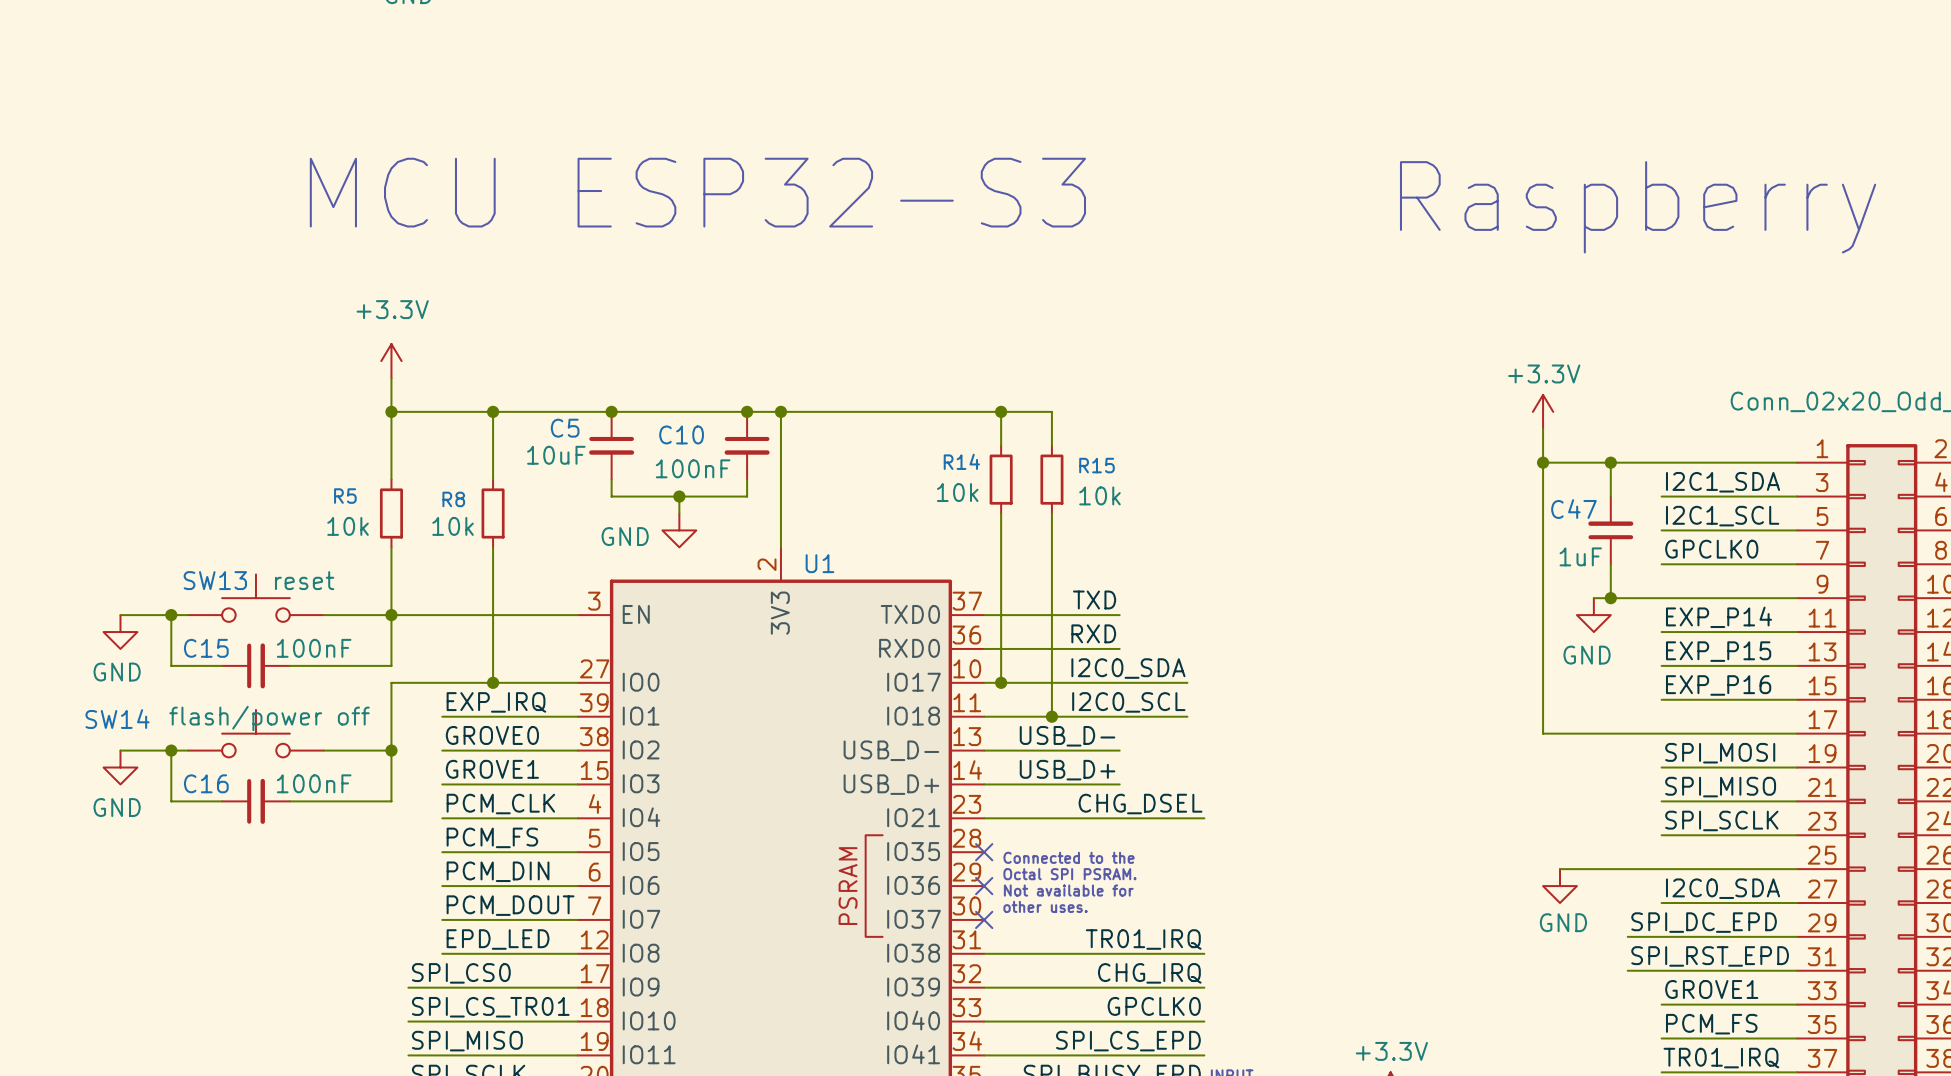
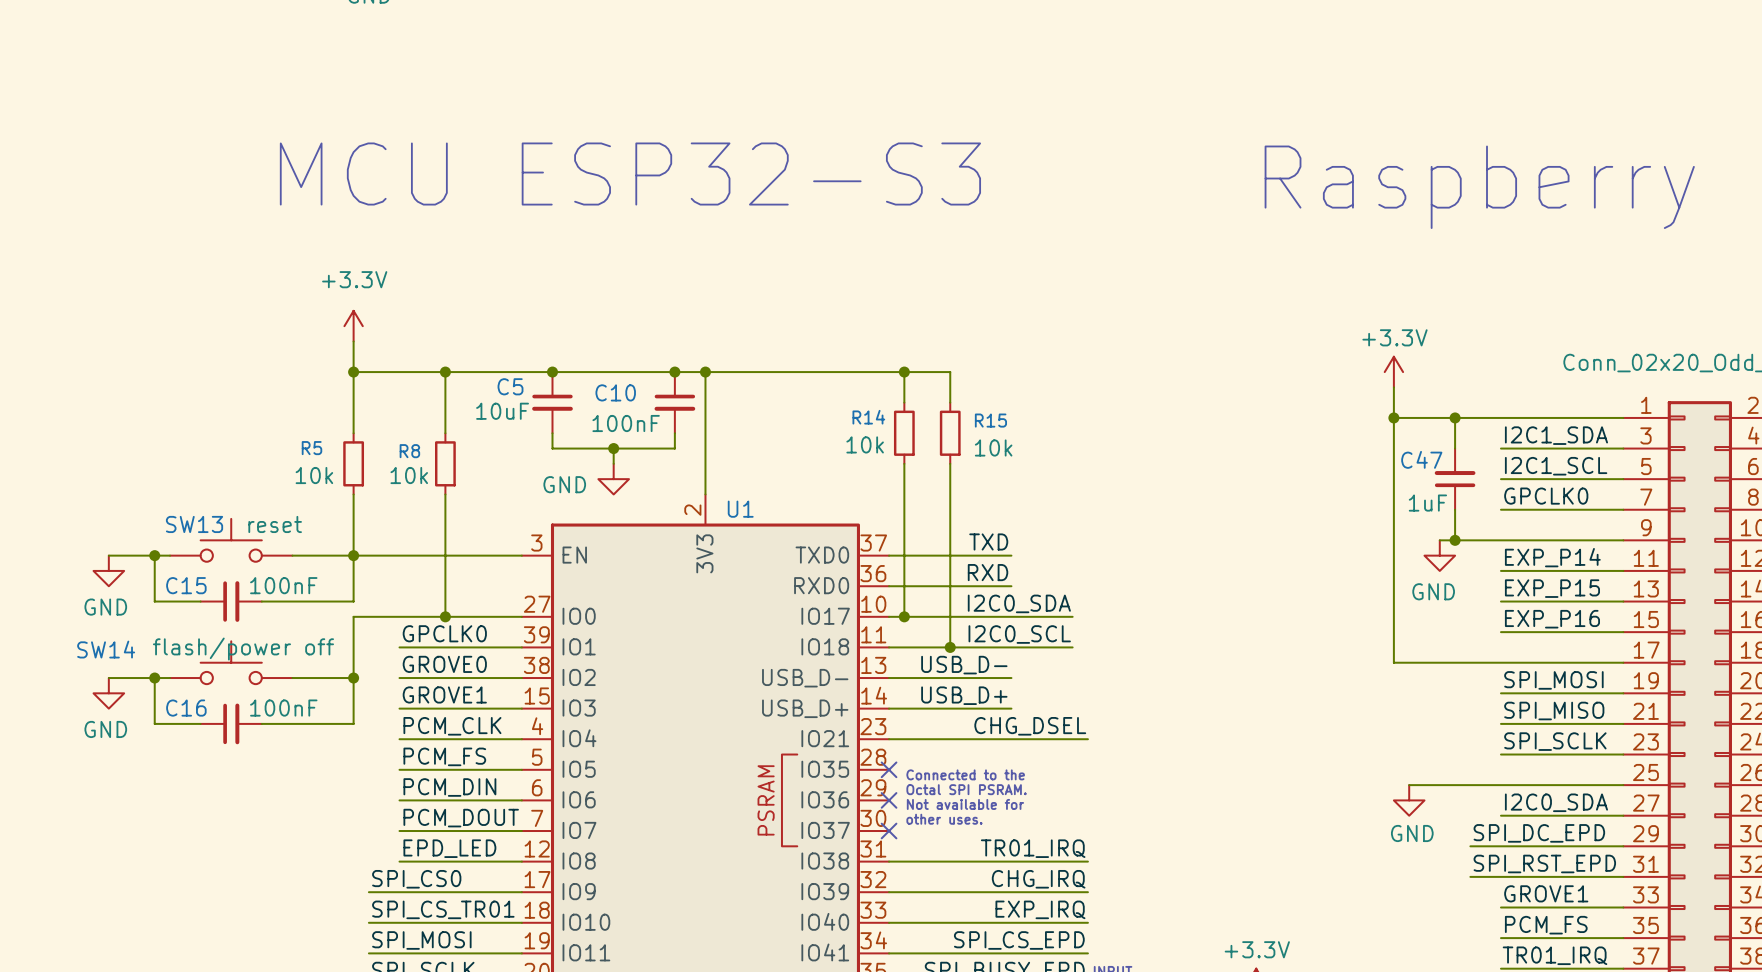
label: EXP_IRQ (496, 702) -> GPCLK0 (444, 633)
label: GPCLK0 (1154, 1006) -> EXP_IRQ (1040, 909)
label: SPI_MISO (467, 1041) -> SPI_MOSI (421, 940)

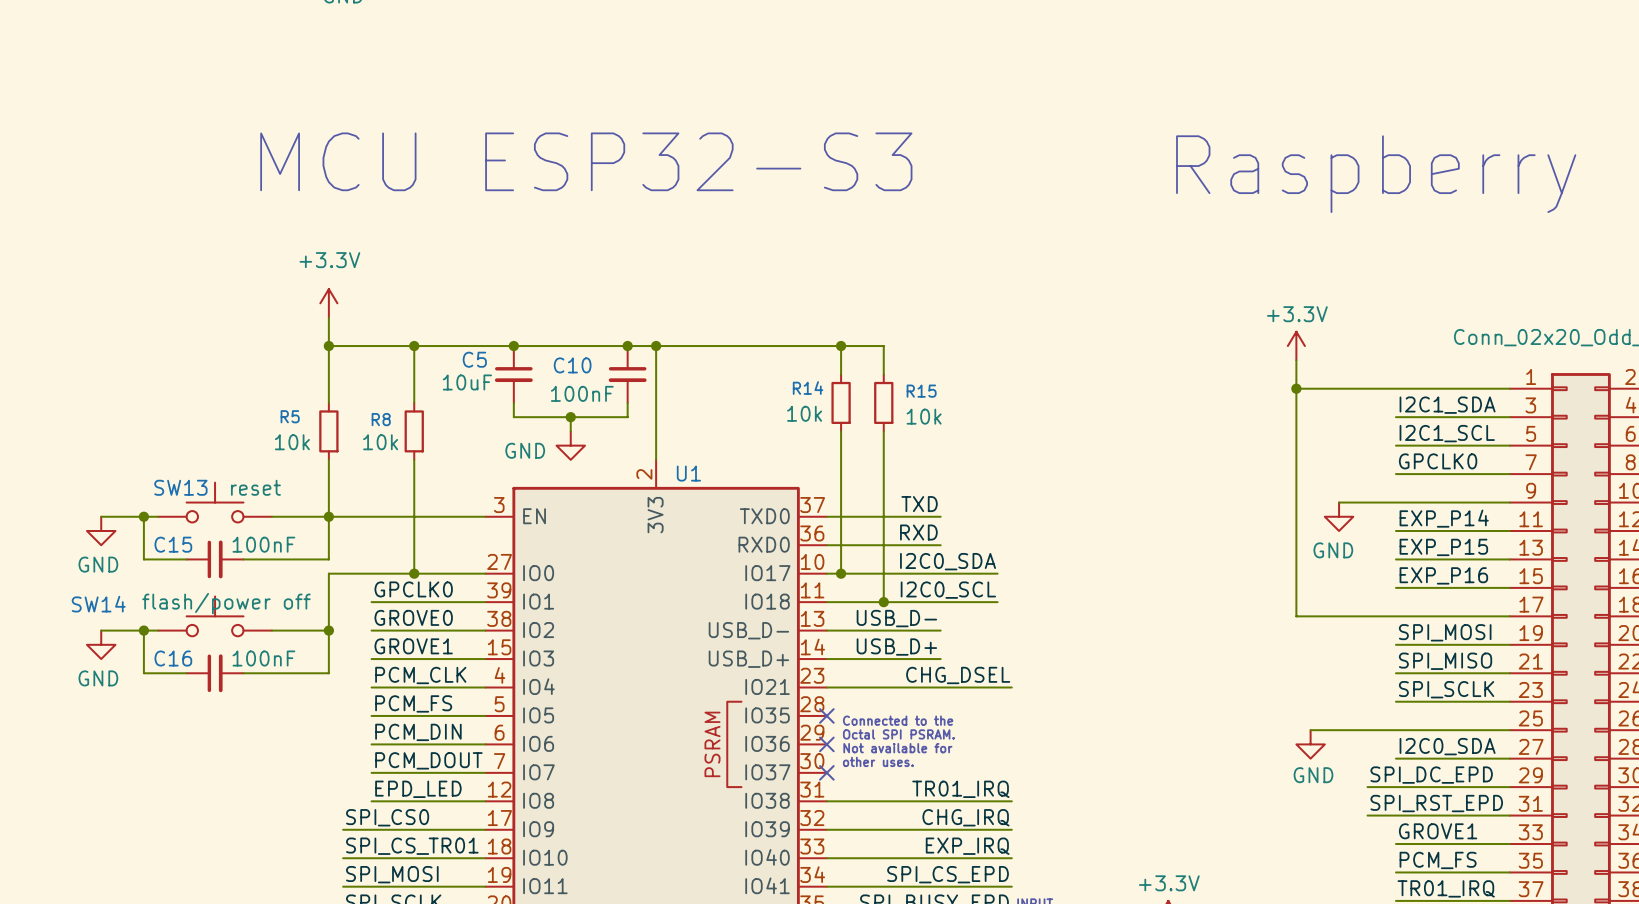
wire: (1455, 417) (1455, 448) -> none
junction: (1455, 417) -> none
C47: 1uF (1455, 479) -> none
wire: (1455, 509) (1455, 540) -> none
junction: (1455, 540) -> none

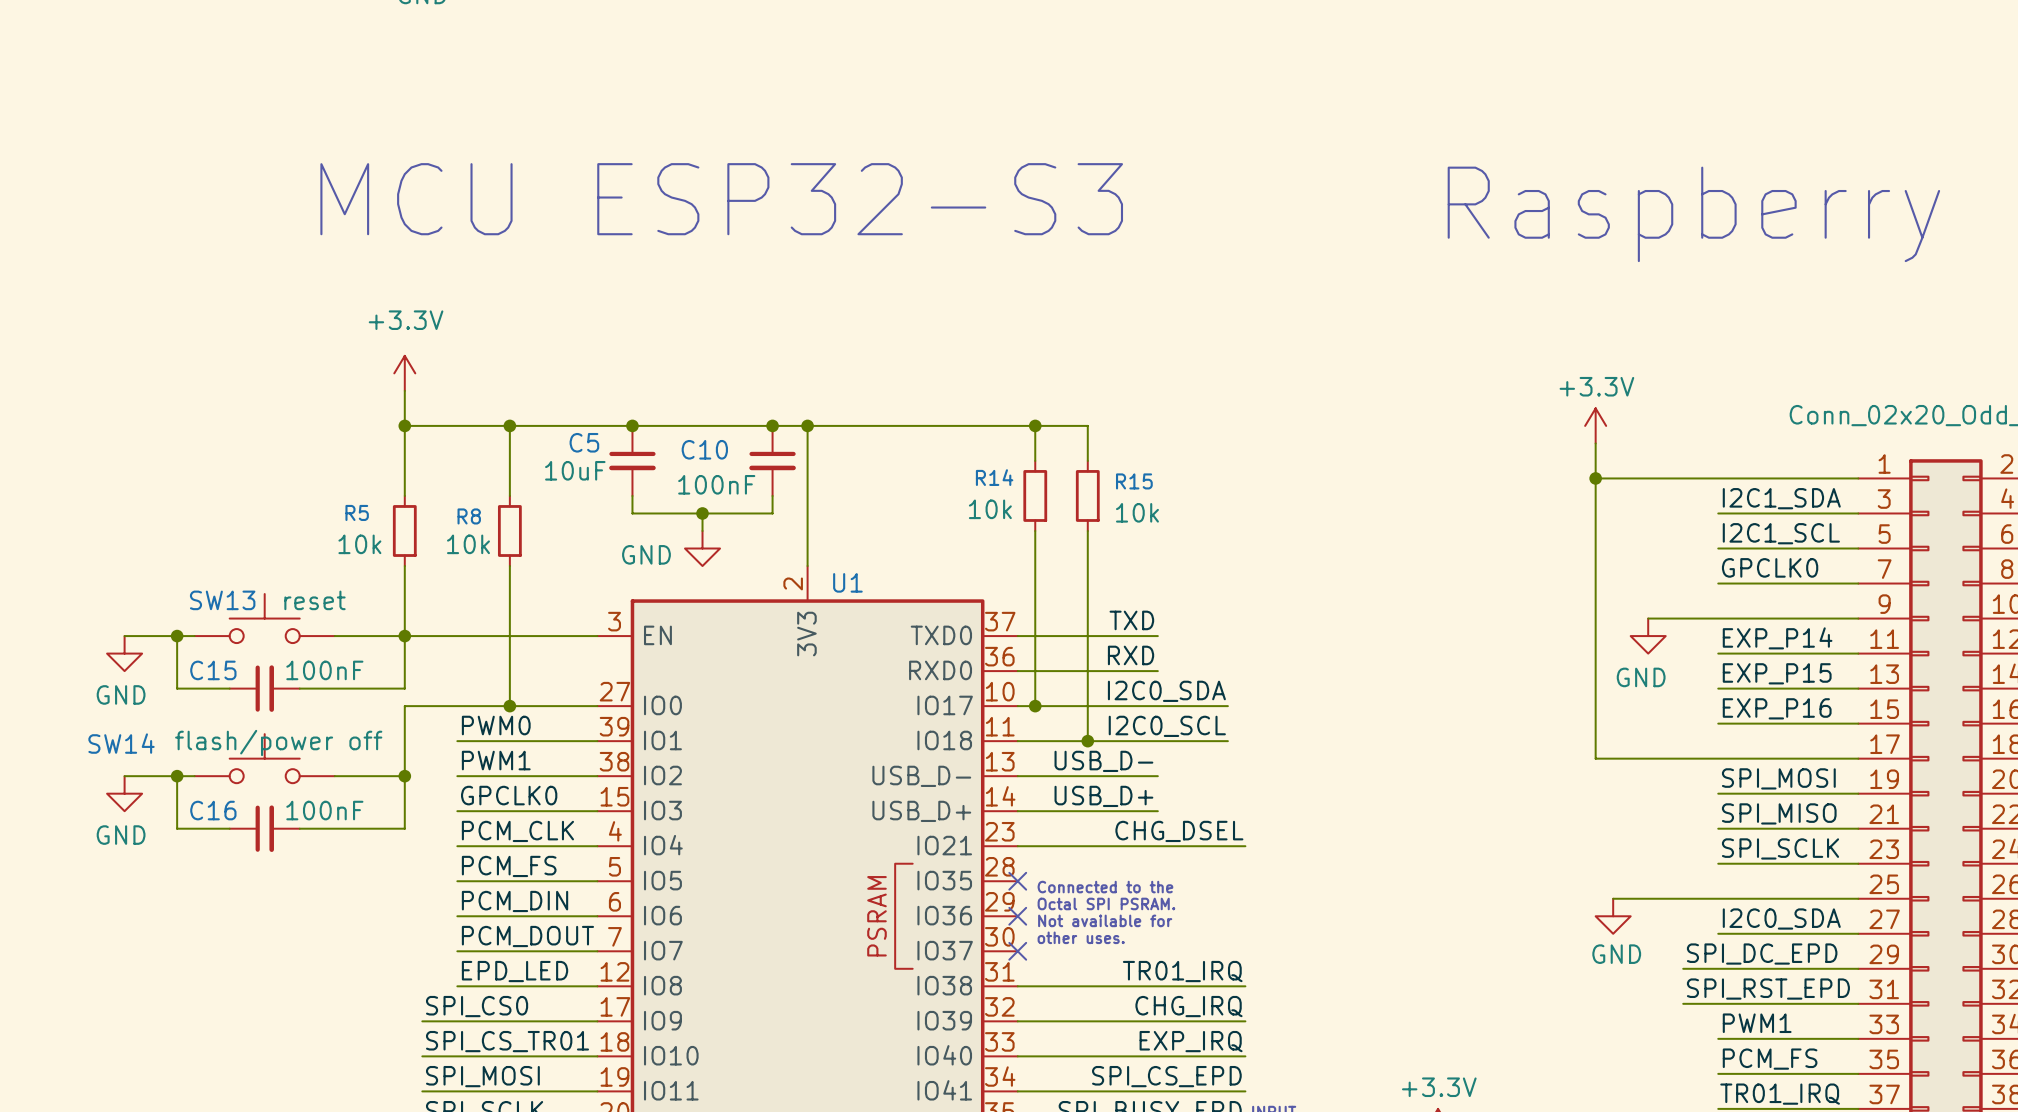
label: GPCLK0 (413, 589) -> PWM0 (496, 725)
label: GROVE0 (413, 617) -> PWM1 (496, 760)
label: GROVE1 (413, 646) -> GPCLK0 (509, 795)
label: GROVE1 (1438, 831) -> PWM1 (1757, 1023)

